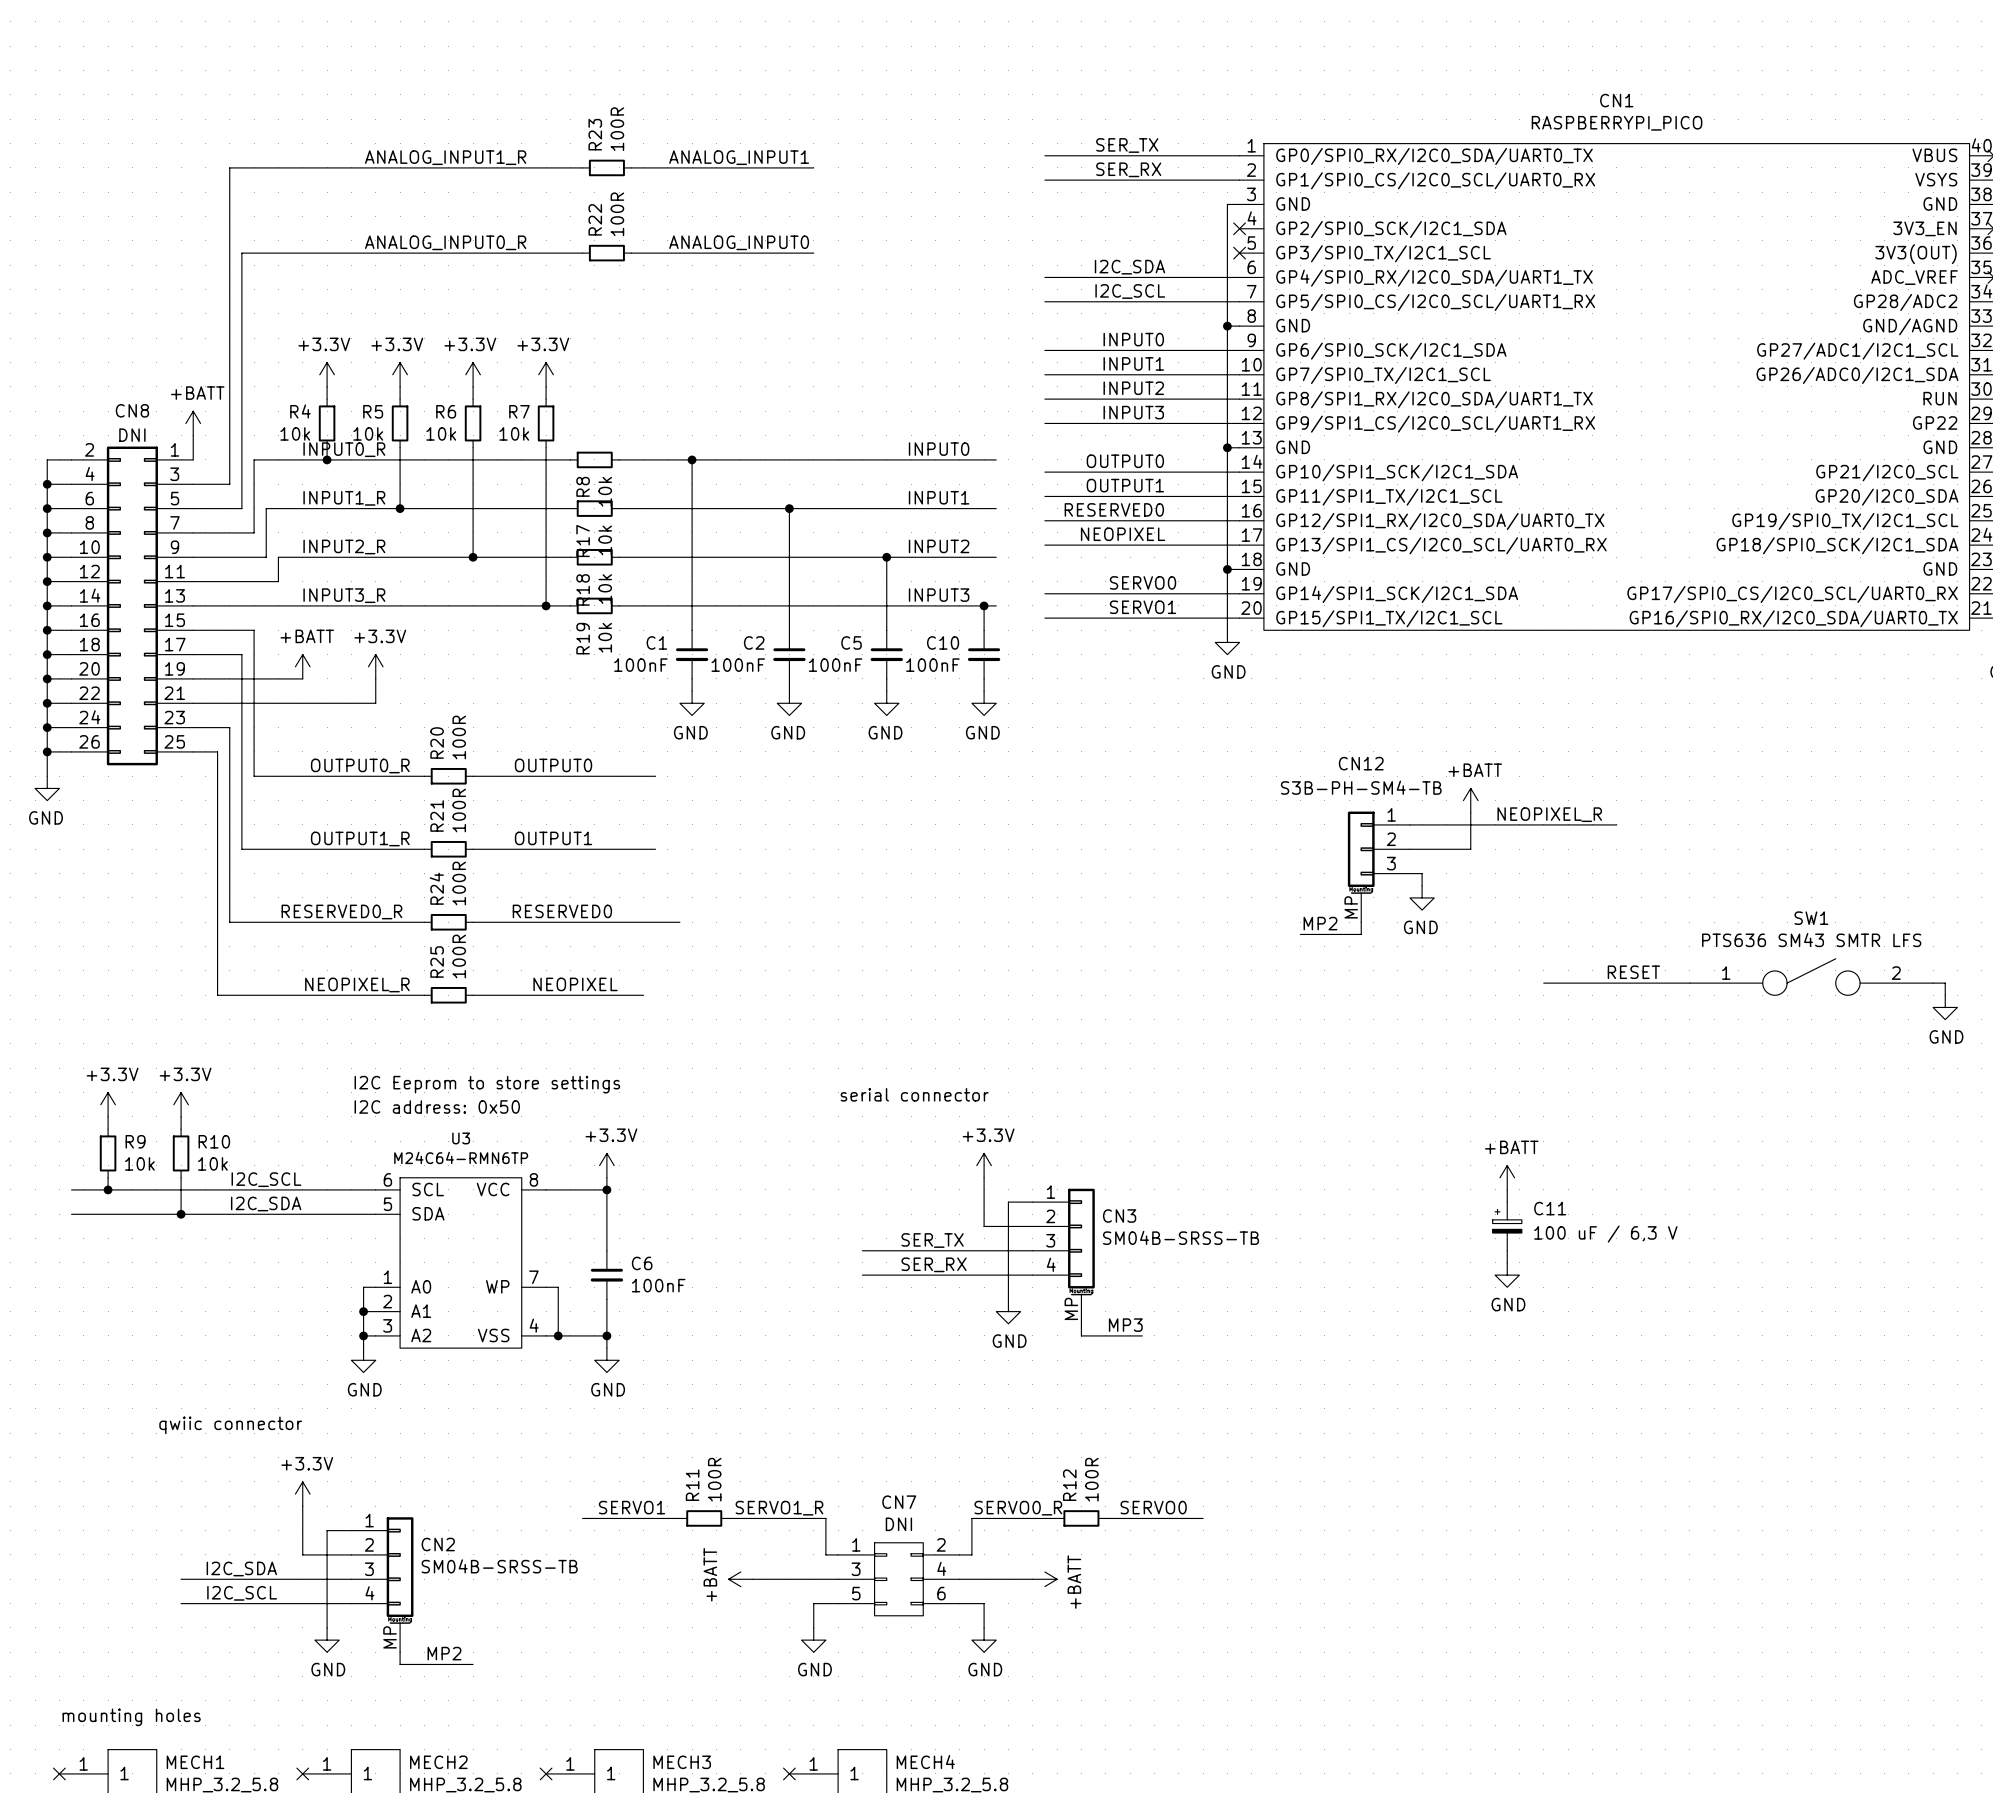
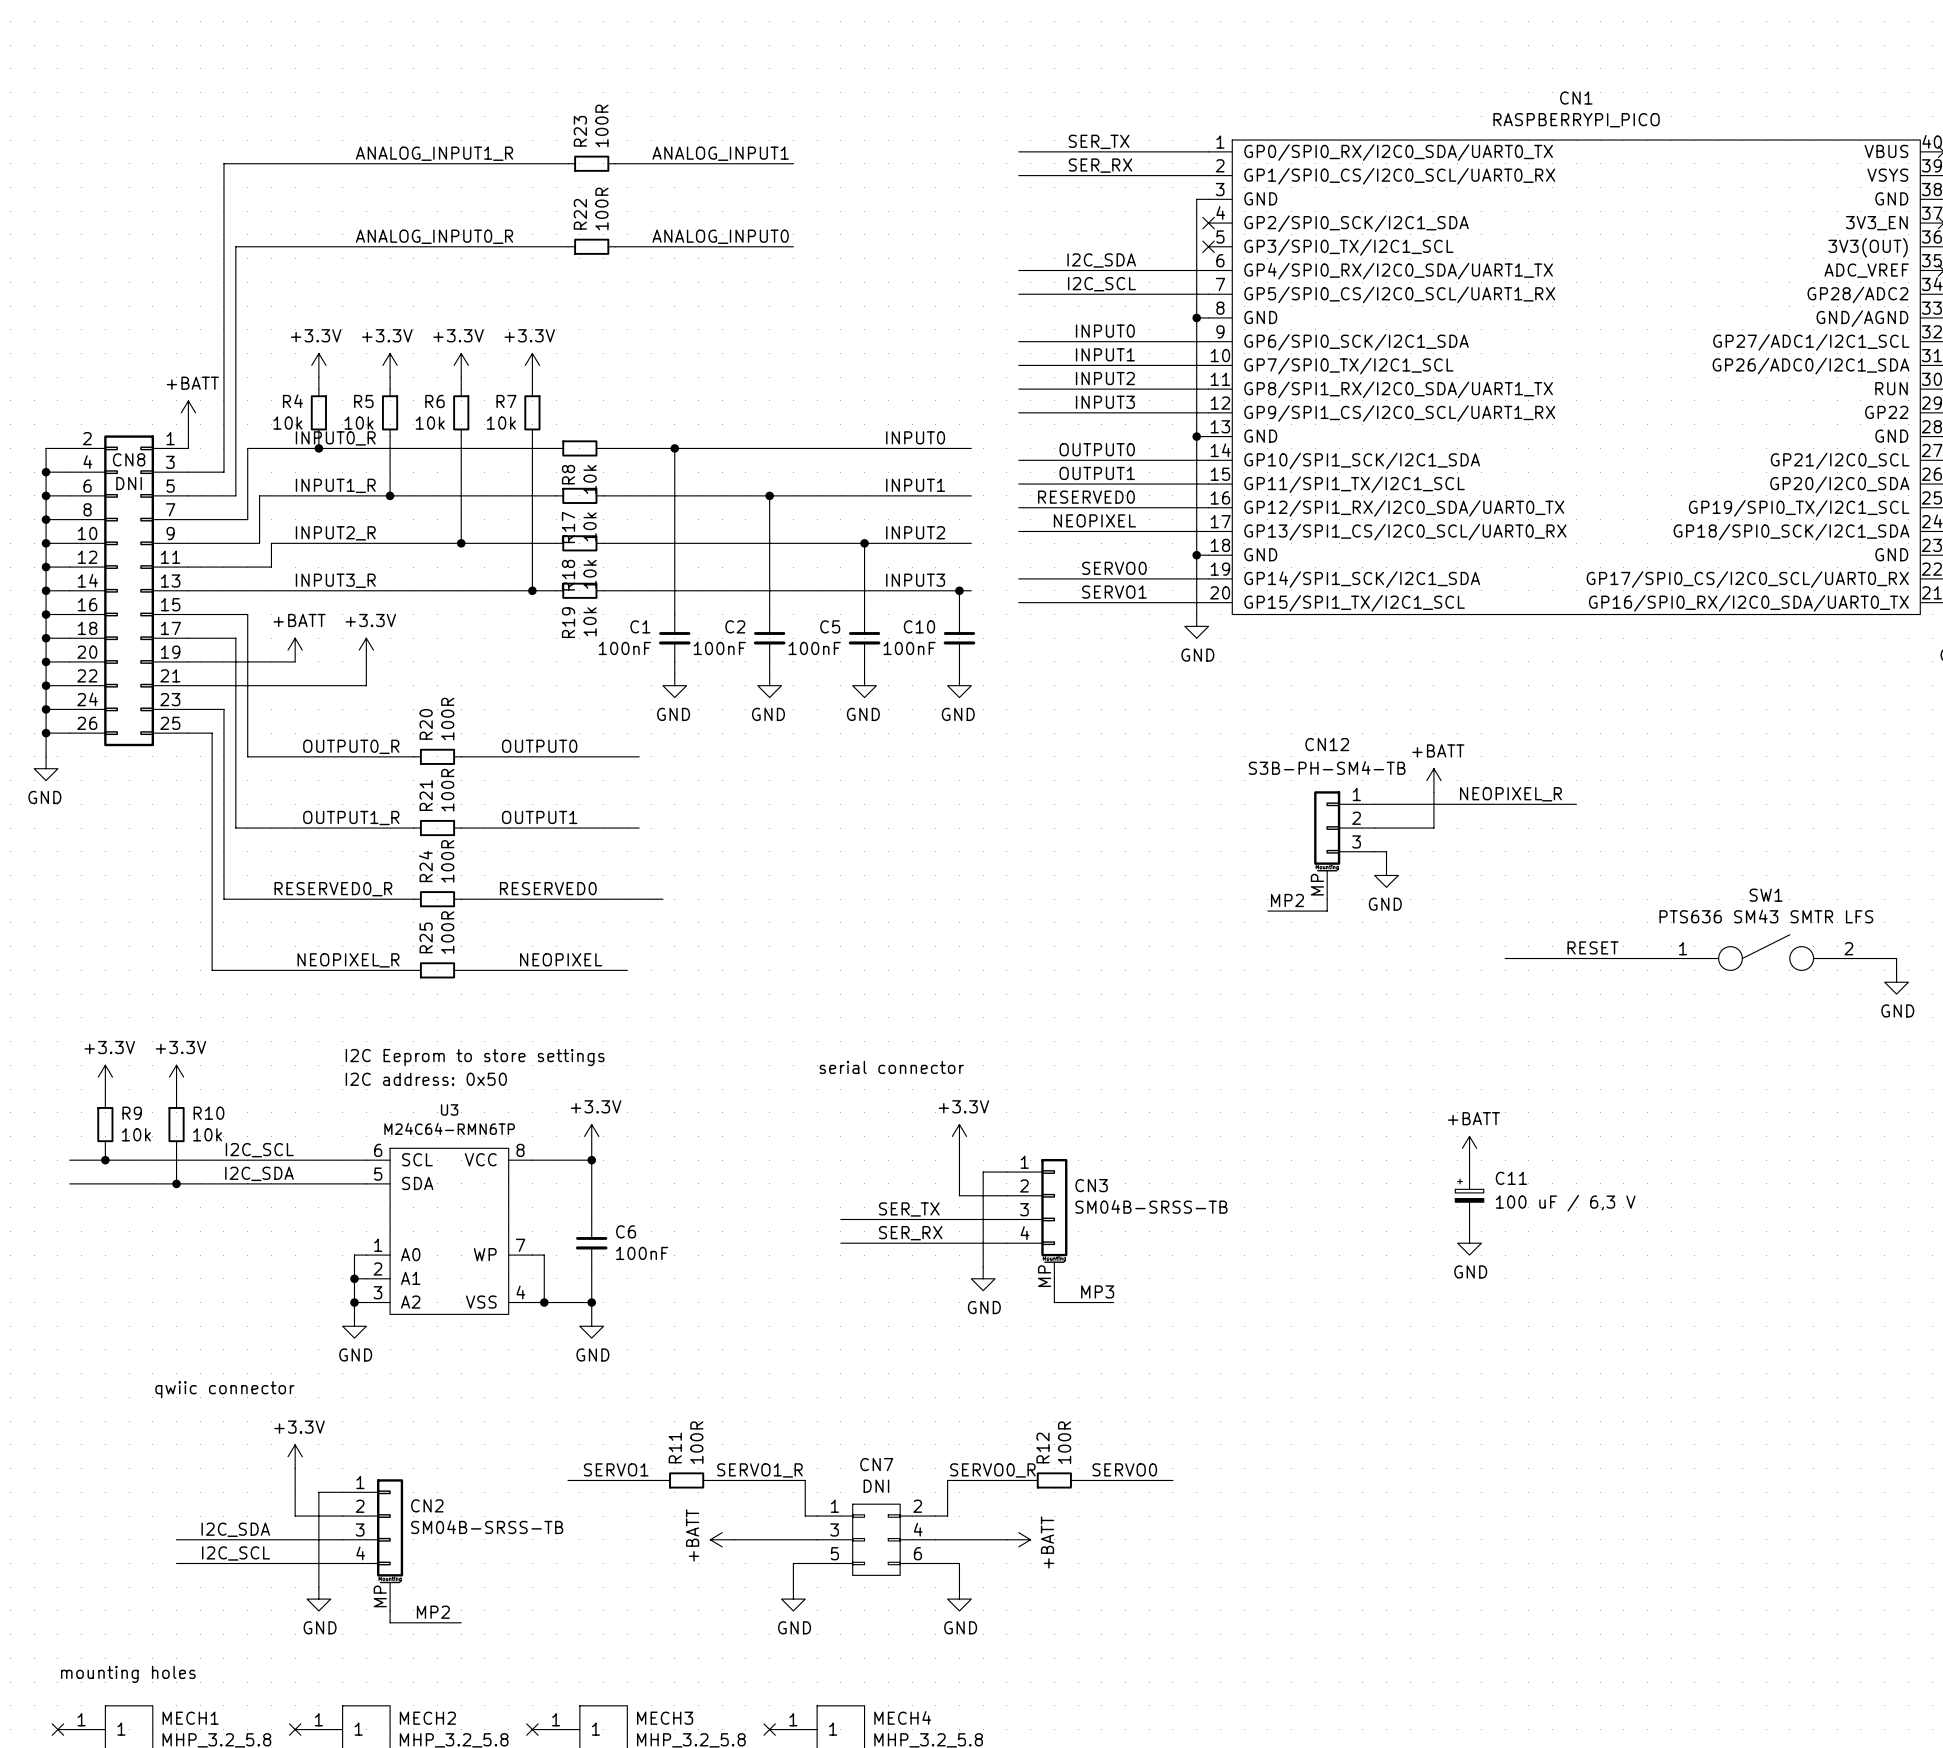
CN8 name position: CN8 (132, 410) -> CN8 (129, 459)
CN8 value position: DNI (132, 435) -> DNI (129, 483)

